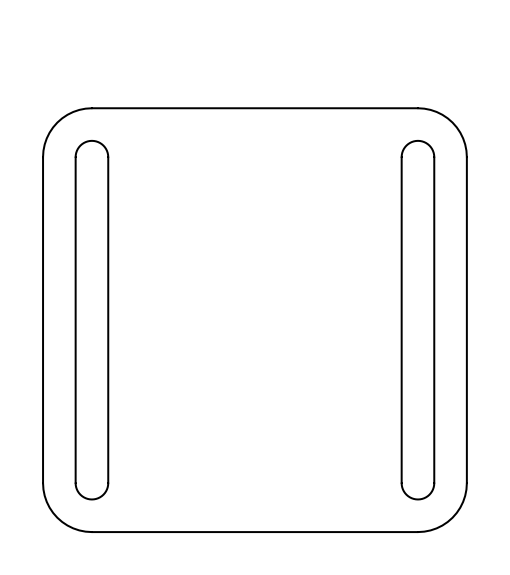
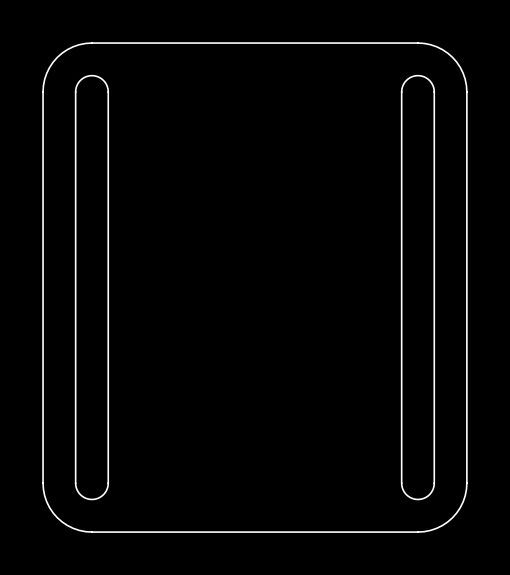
board edge: (108, 157) (103, 145) (91, 140) (80, 145) (75, 157) -> (108, 157) (107, 87) (101, 79) (91, 75) (82, 79) (76, 87) (75, 157)
board edge: (434, 157) (429, 145) (417, 140) (406, 145) (401, 157) -> (434, 157) (433, 87) (427, 79) (417, 75) (408, 79) (402, 87) (401, 157)
board edge: (466, 157) (463, 138) (452, 122) (436, 111) (417, 108) (85, 108) (67, 114) (57, 122) (46, 138) (43, 157) -> (466, 157) (466, 91) (463, 73) (456, 62) (447, 53) (436, 46) (417, 43) (91, 43) (79, 44) (67, 49) (57, 57) (49, 67) (44, 79) (43, 157)

